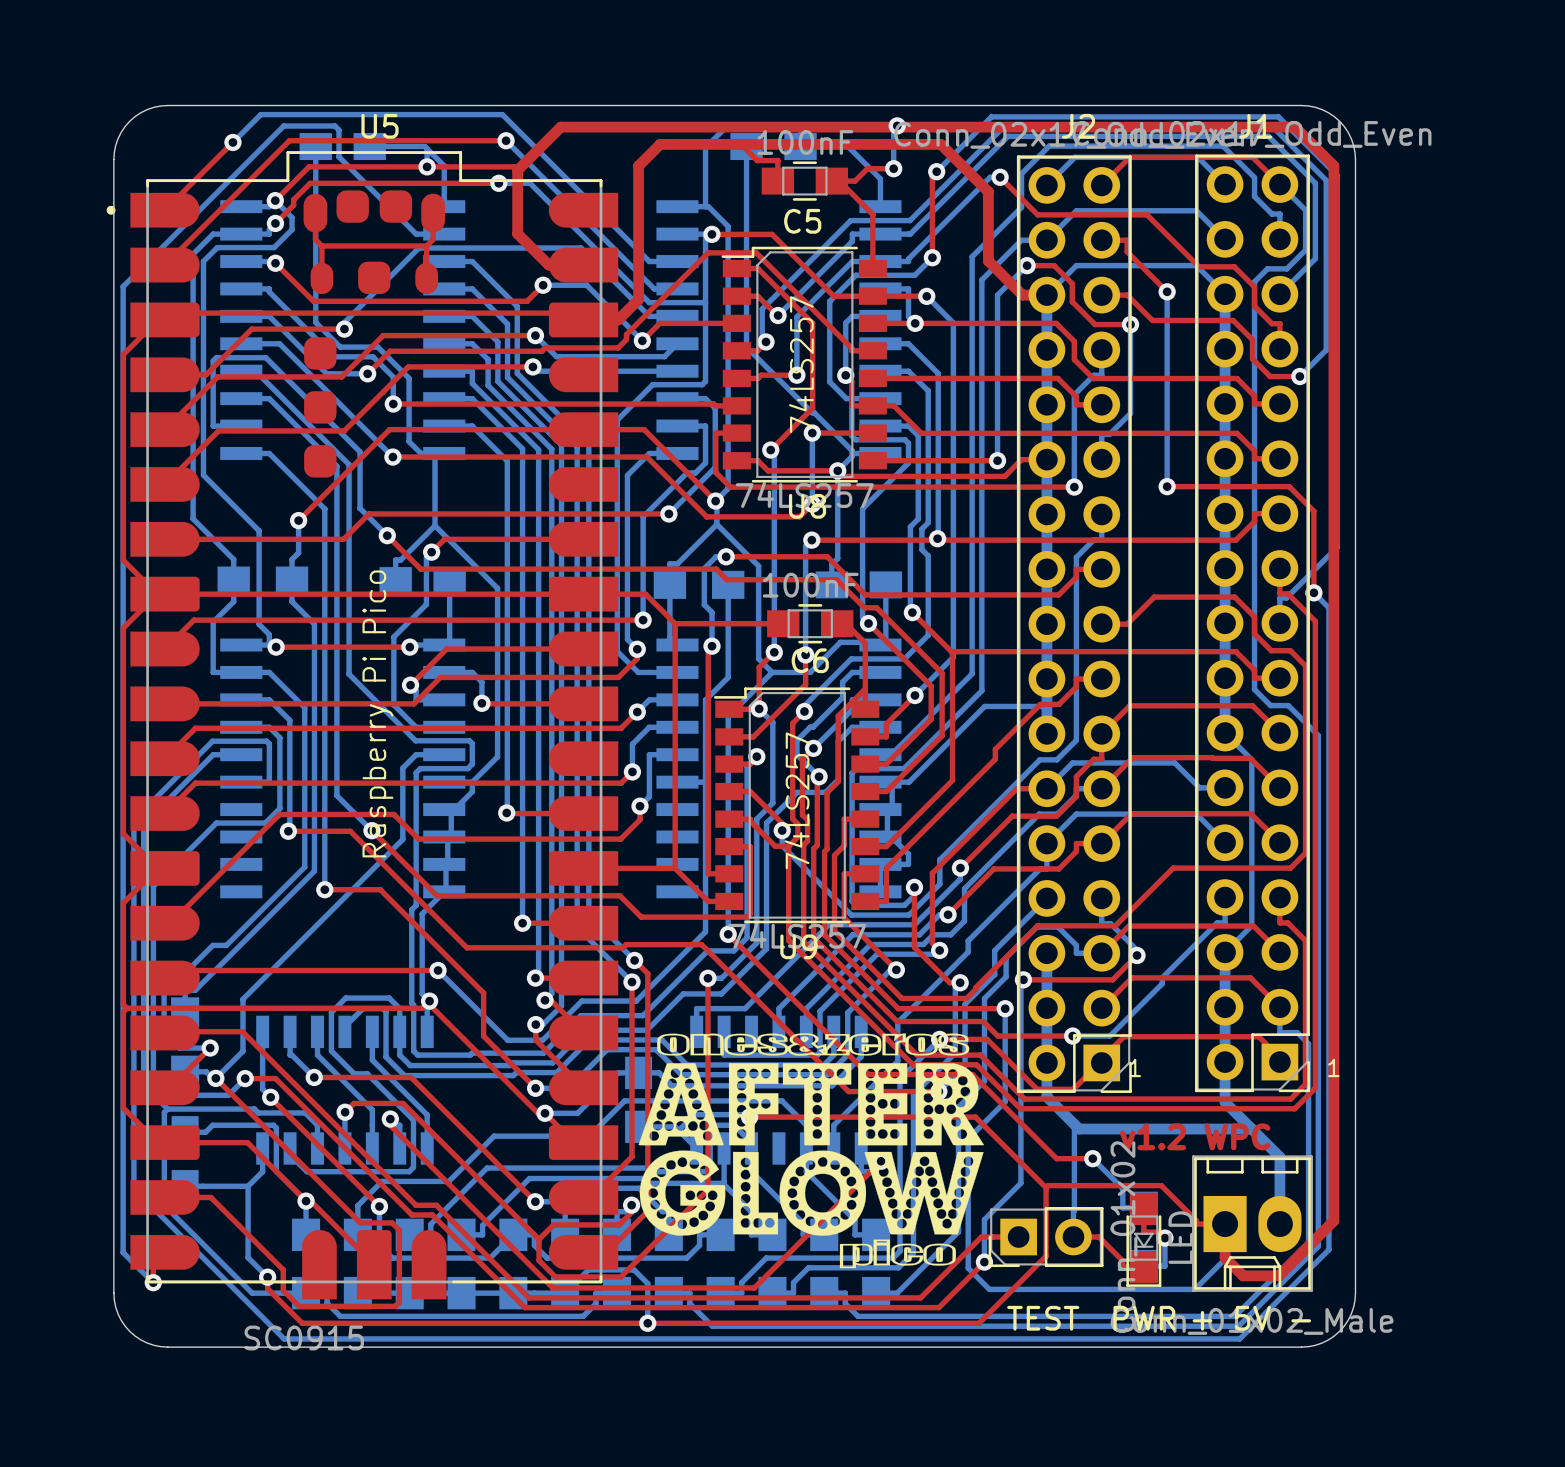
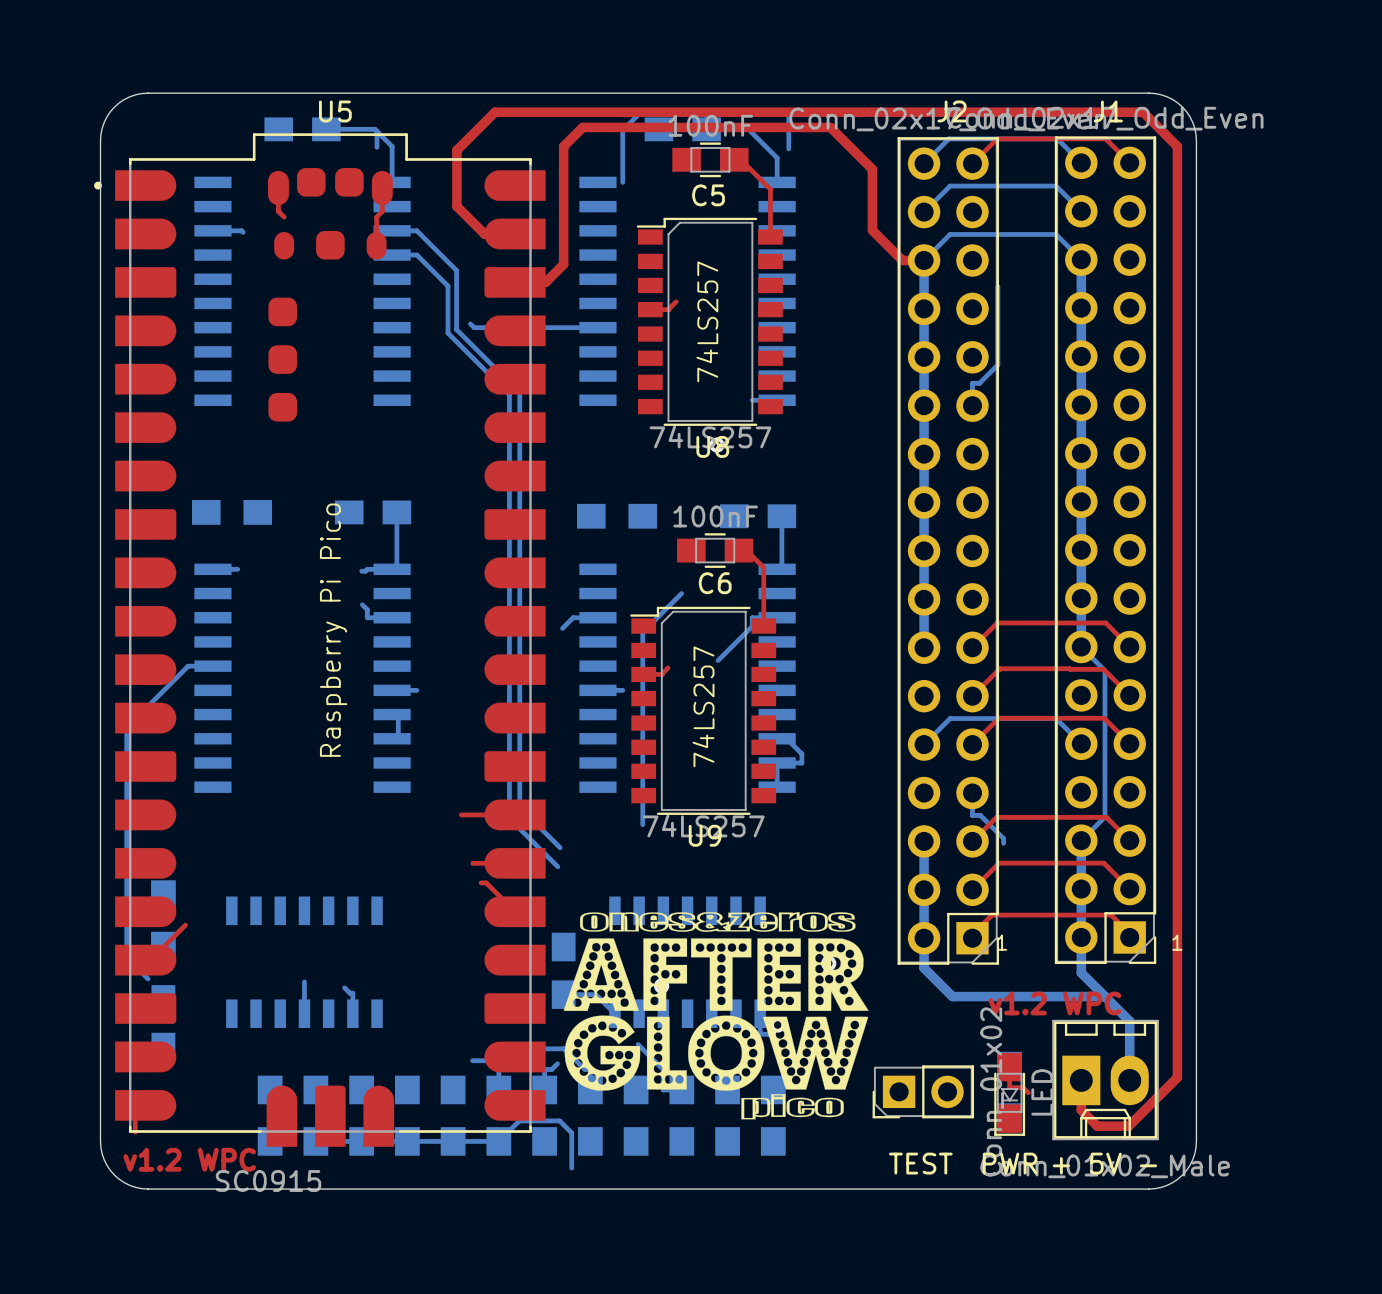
via: (897, 125) -> none
bottom track: (506, 140) (654, 288) (677, 288) -> none
top track: (506, 140) (289, 140) (165, 265) -> none
via: (506, 140) -> none
bottom track: (232, 142) (260, 114) (502, 114) (649, 261) (677, 261) -> none
top track: (232, 142) (165, 210) -> none
via: (232, 142) -> none
top track: (741, 144) (757, 160) (777, 160) (777, 181) -> none
bottom track: (315, 146) (315, 322) (340, 347) (377, 347) (409, 378) (409, 441) (420, 453) (444, 453) -> none
bottom track: (746, 146) (746, 347) (852, 450) (852, 456) (837, 470) (837, 558) (831, 564) (831, 584) -> none
via: (427, 166) -> none
top track: (893, 168) (867, 168) (855, 181) (839, 181) -> none
via: (893, 168) -> none
top track: (517, 170) (514, 166) (309, 166) (275, 200) -> none
bottom track: (936, 171) (991, 116) (1278, 116) (1337, 175) (1337, 547) (1286, 597) (1279, 597) (1279, 623) -> none
top track: (936, 171) (932, 176) (932, 257) -> none
via: (936, 171) -> none
bottom track: (1000, 177) (990, 177) (908, 259) (908, 261) (852, 261) (796, 316) (796, 375) -> none
top track: (1000, 177) (1037, 214) (1147, 214) (1198, 266) (1234, 266) (1254, 286) (1254, 306) (1271, 323) (1279, 323) (1279, 349) -> none
via: (1000, 177) -> none
bottom track: (498, 183) (530, 183) (649, 302) (705, 302) -> none
top track: (498, 183) (310, 183) (293, 199) (293, 205) (275, 223) -> none
via: (498, 183) -> none
bottom track: (1279, 184) (1305, 210) (1305, 250) (1286, 268) (1267, 268) (1254, 281) (1254, 689) (1270, 705) (1288, 705) (1318, 735) (1318, 1246) (1238, 1326) (712, 1326) (689, 1303) (689, 1293) (668, 1293) -> none
via: (275, 200) -> none
bottom track: (241, 206) (269, 206) (275, 201) (292, 217) (292, 229) (274, 247) (217, 247) (203, 261) (203, 475) (259, 530) (259, 624) (269, 634) (269, 645) (276, 647) -> none
bottom track: (677, 206) (708, 206) (728, 226) (728, 488) (715, 501) (716, 524) -> none
bottom track: (275, 223) (269, 229) (269, 234) (213, 234) (193, 254) (193, 518) (233, 559) (233, 601) (213, 622) (213, 672) (269, 672) (304, 707) (304, 867) (226, 945) (212, 945) (164, 994) (164, 1032) (179, 1048) (210, 1048) -> none
via: (275, 223) -> none
bottom track: (444, 234) (416, 234) (338, 156) (338, 130) (334, 126) (283, 126) (123, 286) (123, 1252) (153, 1282) -> none
bottom track: (677, 234) (705, 234) (705, 381) (702, 384) (652, 384) (617, 420) (617, 651) (638, 672) (677, 672) -> none
top track: (711, 234) (772, 234) (833, 296) (926, 296) -> none
via: (711, 234) -> none
bottom track: (1279, 239) (1279, 214) (1271, 214) (1254, 196) (1254, 177) (1223, 146) (1049, 146) (1021, 173) (1021, 207) (972, 256) (972, 673) (891, 754) (880, 754) -> none
bottom track: (1046, 240) (1021, 240) (981, 279) (981, 690) (904, 768) (856, 768) (852, 773) (852, 901) (856, 905) (904, 905) (914, 895) (914, 887) -> none
top track: (1101, 240) (1127, 240) (1127, 251) (1167, 291) -> none
top track: (426, 245) (321, 245) (321, 278) -> none
bottom track: (932, 257) (914, 275) (855, 275) (829, 301) (829, 381) (846, 398) (880, 398) -> none
via: (932, 257) -> none
top track: (275, 263) (313, 301) (527, 301) (543, 285) -> none
via: (275, 263) -> none
bottom track: (1027, 265) (997, 295) (997, 460) -> none
top track: (1027, 265) (1054, 265) (1072, 283) (1072, 301) (1095, 324) (1130, 324) -> none
via: (1027, 265) -> none
top track: (736, 268) (757, 268) (812, 323) (812, 408) (770, 450) -> none
bottom track: (543, 285) (586, 285) (642, 340) -> none
via: (543, 285) -> none
bottom track: (241, 288) (269, 288) (269, 291) (334, 356) (372, 356) (393, 377) (393, 404) -> none
bottom track: (880, 288) (908, 288) (908, 316) (915, 323) -> none
bottom track: (1167, 291) (1167, 486) -> none
via: (1167, 291) -> none
bottom track: (1279, 294) (1315, 258) (1315, 183) (1268, 136) (1007, 136) (910, 234) (852, 234) (852, 241) (778, 315) -> none
top track: (1101, 295) (1127, 295) (1152, 320) (1233, 320) (1252, 339) (1252, 358) (1270, 376) (1299, 376) -> none
top track: (736, 296) (757, 296) (778, 315) -> none
bottom track: (926, 296) (953, 322) (953, 657) (915, 695) -> none
via: (926, 296) -> none
via: (778, 315) -> none
bottom track: (241, 316) (269, 316) (326, 373) (367, 373) -> none
bottom track: (444, 316) (472, 316) (497, 341) (497, 381) (561, 445) (561, 1005) (542, 1024) (535, 1024) -> none
bottom track: (677, 316) (649, 316) (581, 248) (418, 248) (344, 322) (344, 329) -> none
bottom track: (880, 316) (852, 316) (845, 322) (845, 375) -> none
top track: (583, 319) (576, 313) (171, 313) (165, 319) (157, 319) (123, 354) (123, 560) (157, 594) -> none
top track: (736, 323) (659, 323) (642, 340) -> none
top track: (872, 323) (1056, 323) (1074, 341) (1074, 359) (1093, 378) (1237, 378) (1254, 396) (1254, 403) (1279, 403) -> none
via: (915, 323) -> none
via: (1130, 324) -> none
top track: (344, 329) (251, 329) (206, 374) (165, 374) -> none
via: (344, 329) -> none
bottom track: (535, 335) (556, 356) (664, 356) (677, 343) -> none
top track: (535, 335) (383, 335) (341, 376) (217, 376) (165, 429) -> none
via: (535, 335) -> none
via: (642, 340) -> none
bottom track: (766, 341) (762, 338) (762, 309) (850, 220) (909, 220) (1003, 126) (1272, 126) (1326, 180) (1326, 350) (1299, 376) -> none
via: (766, 341) -> none
bottom track: (241, 343) (279, 343) (392, 457) -> none
bottom track: (444, 343) (472, 343) (488, 359) (488, 385) (551, 449) (551, 993) (544, 1000) -> none
bottom track: (880, 343) (908, 343) (938, 373) (937, 538) -> none
bottom track: (1101, 349) (1101, 375) (1093, 375) (1074, 394) (1074, 487) -> none
top track: (872, 350) (851, 350) (851, 348) (756, 252) (708, 252) (626, 334) (626, 339) (618, 347) (545, 347) (541, 351) (390, 351) (367, 373) -> none
top track: (532, 366) (408, 366) (344, 430) (218, 430) (165, 484) -> none
via: (532, 366) -> none
bottom track: (241, 371) (255, 371) (349, 464) (349, 674) (415, 740) (469, 740) (472, 743) (472, 764) (467, 768) (420, 768) (416, 772) (416, 905) (411, 909) (411, 1003) (413, 1005) (413, 1050) (417, 1055) (543, 1053) (581, 1015) (642, 1015) (707, 950) (733, 950) (747, 937) (747, 766) (756, 756) -> none
bottom track: (444, 371) (472, 371) (472, 383) (538, 449) (538, 974) (535, 978) -> none
bottom track: (880, 371) (908, 371) (928, 390) (928, 522) (921, 529) (921, 549) (928, 555) (928, 635) (904, 658) (851, 658) (804, 705) (804, 711) -> none
via: (367, 373) -> none
top track: (796, 375) (761, 375) (757, 378) (736, 378) -> none
via: (796, 375) -> none
top track: (845, 375) (851, 381) (851, 405) (893, 405) (921, 433) (1237, 433) (1254, 450) (1254, 458) (1279, 458) -> none
via: (845, 375) -> none
via: (1299, 376) -> none
top track: (872, 378) (1057, 378) (1076, 396) (1076, 404) (1101, 404) -> none
bottom track: (241, 398) (269, 398) (336, 466) (336, 795) (371, 830) -> none
bottom track: (444, 398) (472, 398) (522, 448) (522, 923) -> none
bottom track: (677, 398) (705, 398) (715, 408) (715, 467) (668, 513) -> none
bottom track: (851, 398) (851, 435) (855, 439) (904, 439) (908, 443) (908, 462) (862, 508) (862, 617) (868, 623) -> none
top track: (393, 404) (713, 404) (715, 405) (736, 405) -> none
via: (393, 404) -> none
bottom track: (241, 426) (213, 426) (213, 360) (216, 357) (265, 357) (360, 451) (360, 508) (387, 535) -> none
bottom track: (444, 426) (472, 426) (507, 461) (506, 812) -> none
bottom track: (677, 426) (705, 426) (705, 462) (695, 472) (687, 472) (643, 516) (643, 620) -> none
bottom track: (880, 426) (908, 426) (918, 435) (918, 519) (910, 526) (910, 610) (912, 612) -> none
top track: (736, 433) (715, 433) (715, 472) (730, 487) (1074, 487) -> none
bottom track: (812, 433) (812, 504) -> none
via: (812, 433) -> none
bottom track: (770, 450) (774, 453) (774, 652) -> none
via: (770, 450) -> none
bottom track: (241, 453) (269, 453) (324, 508) (324, 889) -> none
bottom track: (435, 453) (435, 525) -> none
bottom track: (677, 453) (649, 453) (627, 475) (627, 639) (637, 649) -> none
top track: (392, 457) (646, 457) (706, 516) (799, 516) (812, 504) -> none
via: (392, 457) -> none
top track: (1046, 459) (1021, 459) (1004, 476) (843, 476) (837, 470) (768, 470) (757, 460) (736, 460) -> none
top track: (872, 460) (997, 460) -> none
via: (997, 460) -> none
via: (837, 470) -> none
top track: (1167, 486) (1289, 486) (1313, 511) (1313, 592) -> none
via: (1167, 486) -> none
via: (1074, 487) -> none
top track: (715, 501) (644, 429) (389, 429) (298, 520) -> none
via: (715, 501) -> none
top track: (668, 513) (369, 513) (343, 539) (165, 539) -> none
via: (668, 513) -> none
top track: (1279, 513) (1254, 513) (1254, 521) (1235, 540) (811, 540) -> none
bottom track: (1101, 514) (1101, 539) (1093, 539) (1076, 557) (1076, 740) (1056, 759) (1039, 759) (939, 859) (939, 884) (908, 915) (851, 915) (782, 845) (782, 830) -> none
bottom track: (298, 520) (298, 552) (292, 559) (292, 601) (314, 624) (314, 871) (195, 990) (185, 990) (185, 1013) -> none
via: (298, 520) -> none
bottom track: (716, 524) (758, 566) (758, 658) (772, 672) (810, 672) (840, 642) (883, 642) -> none
bottom track: (716, 524) (677, 563) (669, 563) (669, 637) (677, 645) -> none
bottom track: (435, 525) (497, 588) (497, 756) (472, 782) (472, 791) (454, 809) (444, 809) -> none
bottom track: (435, 525) (400, 560) (395, 560) (395, 580) -> none
top track: (387, 535) (420, 569) (716, 569) (726, 579) (836, 579) (864, 607) (876, 607) (942, 673) (942, 735) (886, 791) (865, 791) -> none
via: (387, 535) -> none
via: (937, 538) -> none
top track: (583, 539) (444, 539) (431, 552) -> none
bottom track: (811, 540) (805, 546) (805, 654) -> none
via: (811, 540) -> none
bottom track: (431, 552) (426, 557) (426, 604) (393, 637) (393, 704) (416, 727) (444, 727) -> none
via: (431, 552) -> none
bottom track: (726, 556) (716, 556) (704, 568) (704, 604) (712, 612) (712, 646) -> none
top track: (726, 556) (827, 556) (865, 594) (1058, 594) (1076, 577) (1076, 569) (1101, 569) -> none
via: (726, 556) -> none
top track: (1279, 568) (1279, 593) (1287, 593) (1315, 621) (1315, 1088) (1294, 1108) (1020, 1108) (976, 1064) (912, 1064) (788, 940) (788, 846) -> none
bottom track: (728, 584) (728, 677) (705, 700) (705, 931) (636, 1001) (581, 1001) (542, 1040) (507, 1040) (438, 970) -> none
bottom track: (1313, 592) (1328, 607) (1328, 1249) (1239, 1338) (284, 1338) (133, 1188) (133, 819) (212, 741) (266, 741) (269, 743) (269, 782) (241, 782) -> none
via: (1313, 592) -> none
top track: (157, 594) (123, 628) (123, 833) (157, 868) -> none
top track: (157, 594) (645, 594) (675, 623) -> none
top track: (912, 612) (951, 651) (1235, 651) (1254, 670) (1254, 678) (1279, 678) -> none
via: (912, 612) -> none
top track: (643, 620) (193, 620) (165, 649) -> none
via: (643, 620) -> none
top track: (675, 623) (675, 868) -> none
top track: (675, 623) (783, 623) -> none
top track: (868, 623) (931, 686) (931, 719) (886, 764) (865, 764) -> none
via: (868, 623) -> none
top track: (1101, 624) (1127, 624) (1154, 597) (1234, 597) (1254, 616) (1254, 633) (1271, 650) (1290, 650) (1305, 665) (1305, 853) (1290, 868) (1173, 868) (1115, 925) (1037, 925) (966, 998) (901, 998) (834, 931) (834, 855) (844, 845) (844, 819) (865, 819) -> none
top track: (712, 646) (708, 649) (708, 873) (729, 873) -> none
via: (712, 646) -> none
top track: (276, 647) (409, 647) -> none
via: (276, 647) -> none
via: (409, 647) -> none
top track: (583, 649) (446, 649) (410, 685) -> none
top track: (637, 649) (637, 658) (618, 677) (440, 677) (414, 703) (165, 703) -> none
via: (637, 649) -> none
top track: (952, 651) (952, 780) (886, 846) (865, 846) -> none
top track: (774, 652) (759, 667) (759, 708) (729, 709) -> none
via: (774, 652) -> none
top track: (805, 654) (805, 684) (753, 736) (729, 736) -> none
via: (805, 654) -> none
bottom track: (444, 672) (472, 672) (481, 682) (481, 703) -> none
bottom track: (880, 672) (852, 672) (842, 682) (842, 697) (796, 740) (796, 754) (819, 776) -> none
top track: (1101, 679) (1076, 679) (1076, 686) (1058, 704) (1040, 704) (995, 749) (995, 759) (886, 868) (886, 901) (865, 901) -> none
via: (410, 685) -> none
top track: (865, 688) (838, 715) (838, 781) (827, 792) (824, 934) (898, 1008) (1005, 1008) -> none
top track: (915, 695) (886, 724) (886, 736) (865, 736) -> none
via: (915, 695) -> none
bottom track: (241, 699) (269, 699) (289, 720) (288, 831) -> none
top track: (481, 703) (583, 703) -> none
via: (481, 703) -> none
bottom track: (1046, 706) (984, 706) (909, 782) (880, 782) -> none
bottom track: (759, 708) (772, 722) (772, 803) (756, 819) (756, 943) (721, 978) (707, 978) -> none
via: (759, 708) -> none
top track: (804, 711) (792, 723) (792, 818) (797, 824) (797, 837) (788, 846) -> none
via: (804, 711) -> none
top track: (637, 712) (621, 728) (195, 728) (165, 758) -> none
via: (637, 712) -> none
bottom track: (241, 727) (269, 727) (279, 737) (279, 808) (265, 823) (216, 823) (153, 886) (153, 1080) (167, 1095) (228, 1095) (245, 1078) -> none
bottom track: (677, 727) (649, 727) (632, 744) (632, 771) -> none
bottom track: (880, 727) (852, 727) (838, 741) (838, 779) (825, 792) (797, 792) (766, 823) (766, 948) (721, 993) (683, 993) (646, 1030) (585, 1030) (552, 1062) (512, 1062) (509, 1065) (410, 1065) (399, 1055) (399, 1008) (389, 998) (345, 998) (331, 1012) (331, 1050) (354, 1073) (367, 1073) (413, 1120) (413, 1167) (409, 1171) (306, 1171) (290, 1154) (290, 1148) -> none
top track: (1101, 733) (1101, 759) (1093, 759) (1076, 776) (1076, 796) (1056, 816) (1012, 816) (960, 868) -> none
top track: (813, 748) (802, 759) (802, 814) (807, 820) (807, 841) (803, 844) (803, 941) (916, 1055) (980, 1055) (1024, 1099) (1290, 1099) (1305, 1084) (1305, 940) (1287, 922) (1279, 922) (1279, 897) -> none
via: (813, 748) -> none
bottom track: (444, 754) (416, 754) (402, 768) (402, 839) (242, 999) (242, 1051) (215, 1078) (212, 1078) (206, 1071) (185, 1071) -> none
bottom track: (677, 754) (649, 754) (649, 796) (640, 806) -> none
via: (756, 756) -> none
top track: (632, 771) (621, 783) (195, 783) (165, 813) -> none
via: (632, 771) -> none
top track: (819, 776) (817, 778) (817, 845) (813, 848) (813, 938) (897, 1021) (983, 1021) (997, 1036) (1072, 1036) -> none
via: (819, 776) -> none
bottom track: (892, 782) (892, 809) -> none
bottom track: (1225, 787) (1199, 787) (1174, 762) (1072, 762) (1046, 788) -> none
top track: (1046, 788) (1016, 788) (932, 873) (932, 943) (939, 950) -> none
bottom track: (1101, 788) (1076, 788) (1076, 795) (1057, 814) (1039, 814) (964, 888) (964, 921) (950, 934) (933, 934) (923, 944) (870, 944) (806, 1008) (806, 1031) -> none
top track: (729, 791) (750, 791) (782, 823) (782, 830) -> none
top track: (640, 806) (640, 819) (620, 839) (418, 839) (393, 814) (279, 814) (170, 923) (165, 923) -> none
via: (640, 806) -> none
bottom track: (892, 809) (887, 814) (887, 836) -> none
top track: (506, 812) (583, 813) -> none
via: (506, 812) -> none
top track: (729, 819) (750, 819) (750, 821) (775, 846) (788, 846) -> none
top track: (371, 830) (437, 895) (619, 895) (641, 917) (746, 917) (750, 913) (750, 846) (729, 846) -> none
via: (371, 830) -> none
via: (782, 830) -> none
top track: (288, 831) (350, 831) (466, 947) (623, 947) (626, 944) (701, 944) (848, 1091) (938, 1091) -> none
via: (288, 831) -> none
bottom track: (447, 836) (447, 864) (444, 864) -> none
bottom track: (1046, 843) (1046, 868) (1040, 868) (968, 940) (968, 952) (897, 1022) (897, 1061) (833, 1125) (833, 1148) -> none
top track: (1101, 843) (1076, 843) (1076, 851) (1058, 868) (993, 868) (948, 914) -> none
bottom track: (446, 864) (446, 891) (422, 913) (422, 993) (429, 1001) (427, 1003) (427, 1031) -> none
top track: (157, 868) (123, 903) (123, 1004) (127, 1008) -> none
top track: (583, 868) (675, 868) -> none
top track: (675, 868) (708, 901) (729, 901) -> none
bottom track: (960, 868) (960, 878) (914, 924) (828, 924) (745, 1008) (696, 1008) (696, 1031) -> none
via: (960, 868) -> none
top track: (865, 873) (844, 873) (844, 917) (896, 969) -> none
top track: (914, 887) (914, 947) (949, 982) (960, 982) -> none
via: (914, 887) -> none
top track: (324, 889) (380, 889) (483, 993) (483, 1036) (535, 1088) -> none
via: (324, 889) -> none
bottom track: (1225, 897) (1225, 922) (1217, 922) (1162, 977) (1162, 983) (1109, 1036) (1072, 1036) -> none
bottom track: (1046, 898) (994, 950) (994, 974) (965, 1004) (965, 1065) (938, 1091) -> none
bottom track: (948, 914) (939, 914) (919, 934) (852, 934) (778, 1008) (778, 1031) -> none
via: (948, 914) -> none
via: (522, 923) -> none
top track: (728, 934) (868, 1074) (972, 1074) (1056, 1158) (1092, 1158) -> none
via: (728, 934) -> none
bottom track: (939, 950) (935, 954) (877, 954) (820, 1011) (820, 1052) (817, 1055) (724, 1055) (724, 1031) -> none
via: (939, 950) -> none
bottom track: (1101, 953) (1076, 953) (1076, 945) (1058, 927) (1036, 927) (1006, 957) (1006, 976) (984, 998) (984, 1081) (958, 1107) (958, 1231) (897, 1293) (876, 1293) -> none
top track: (1137, 955) (1112, 979) (1023, 979) -> none
via: (1137, 955) -> none
top track: (634, 960) (647, 973) (647, 1211) (606, 1252) (583, 1252) -> none
via: (634, 960) -> none
bottom track: (896, 969) (890, 969) (847, 1012) (847, 1054) (827, 1074) (681, 1074) (656, 1049) (607, 1049) (568, 1088) (535, 1088) -> none
via: (896, 969) -> none
top track: (438, 970) (172, 970) (165, 978) -> none
via: (438, 970) -> none
via: (535, 978) -> none
top track: (707, 978) (707, 1189) (620, 1276) (555, 1276) (539, 1260) (539, 1239) -> none
via: (707, 978) -> none
bottom track: (1023, 979) (1020, 982) (1020, 1183) (984, 1219) (984, 1262) -> none
via: (1023, 979) -> none
top track: (632, 982) (632, 1156) (591, 1197) (583, 1197) -> none
via: (632, 982) -> none
bottom track: (960, 982) (955, 987) (955, 1052) (913, 1094) (913, 1252) (898, 1267) (808, 1267) (793, 1282) (793, 1293) (772, 1293) -> none
via: (960, 982) -> none
via: (544, 1000) -> none
top track: (429, 1001) (422, 1008) (127, 1008) -> none
via: (429, 1001) -> none
top track: (427, 1002) (538, 1113) (545, 1113) (574, 1142) (583, 1142) -> none
bottom track: (1279, 1007) (1279, 1032) (1297, 1032) (1308, 1043) (1308, 1242) (1234, 1316) (858, 1316) (845, 1303) (845, 1293) (824, 1293) -> none
top track: (127, 1008) (123, 1011) (123, 1108) (157, 1142) (247, 1142) (306, 1201) (310, 1201) (374, 1264) -> none
bottom track: (1005, 1008) (1005, 1101) (968, 1138) (968, 1268) (989, 1289) (1194, 1289) (1225, 1259) (1225, 1224) -> none
via: (1005, 1008) -> none
top track: (535, 1024) (535, 1040) (583, 1087) -> none
via: (535, 1024) -> none
bottom track: (262, 1031) (262, 1089) (270, 1097) -> none
bottom track: (290, 1031) (290, 1055) (314, 1077) -> none
bottom track: (317, 1031) (317, 1055) (372, 1109) (372, 1148) -> none
bottom track: (344, 1031) (344, 1026) (362, 1008) (383, 1008) (386, 1011) (386, 1057) (404, 1075) (513, 1075) (516, 1072) (556, 1072) (589, 1039) (661, 1039) (686, 1064) (823, 1064) (833, 1055) (833, 1031) -> none
bottom track: (372, 1031) (372, 1060) (427, 1114) (427, 1148) -> none
bottom track: (861, 1031) (861, 1056) (832, 1085) (672, 1085) (659, 1072) (618, 1072) (577, 1113) (545, 1113) -> none
top track: (165, 1032) (242, 1031) (416, 1205) (436, 1205) (529, 1297) (920, 1297) (981, 1237) (1018, 1237) -> none
via: (1072, 1036) -> none
bottom track: (939, 1039) (900, 1079) (900, 1251) (893, 1258) (766, 1258) (741, 1282) (741, 1293) (720, 1293) -> none
top track: (939, 1039) (987, 1039) (1037, 1089) (1073, 1089) (1101, 1060) -> none
via: (939, 1039) -> none
via: (210, 1048) -> none
top track: (314, 1077) (411, 1077) (535, 1201) -> none
via: (314, 1077) -> none
top track: (215, 1078) (360, 1222) (392, 1222) (399, 1230) (399, 1302) (395, 1306) (299, 1306) (283, 1290) (283, 1269) (210, 1197) (165, 1197) -> none
via: (215, 1078) -> none
top track: (245, 1078) (275, 1078) (412, 1215) (432, 1215) (525, 1307) (938, 1307) (984, 1262) -> none
via: (245, 1078) -> none
via: (535, 1088) -> none
top track: (270, 1097) (379, 1206) -> none
via: (270, 1097) -> none
top track: (345, 1112) (353, 1103) (403, 1103) (539, 1239) -> none
via: (345, 1112) -> none
via: (545, 1113) -> none
bottom track: (749, 1117) (747, 1114) (694, 1114) (678, 1130) -> none
top track: (749, 1117) (975, 1117) (1046, 1187) -> none
top track: (390, 1119) (390, 1125) (552, 1287) (754, 1287) (881, 1161) -> none
via: (390, 1119) -> none
bottom track: (1074, 1124) (1073, 1237) -> none
bottom track: (185, 1132) (205, 1132) (212, 1125) (273, 1125) (276, 1128) (276, 1171) (306, 1201) (306, 1234) (327, 1234) (327, 1303) (340, 1316) (583, 1316) (595, 1303) (595, 1293) (617, 1293) -> none
bottom track: (262, 1148) (262, 1171) (248, 1186) -> none
bottom track: (317, 1148) (317, 1125) (305, 1112) (258, 1112) (254, 1109) (167, 1109) (164, 1112) (164, 1205) (252, 1293) (306, 1293) -> none
bottom track: (724, 1148) (722, 1183) (648, 1183) (643, 1178) (529, 1178) (482, 1225) (482, 1234) (461, 1234) -> none
bottom track: (1092, 1158) (1122, 1188) (1122, 1207) (1143, 1207) -> none
via: (1092, 1158) -> none
bottom track: (185, 1186) (248, 1186) -> none
bottom track: (248, 1186) (248, 1257) (267, 1277) -> none
top track: (1046, 1187) (1046, 1256) (978, 1323) (302, 1323) (267, 1288) (267, 1277) -> none
top track: (1046, 1187) (1048, 1185) (1161, 1185) (1196, 1220) (1196, 1224) (1225, 1224) -> none
via: (306, 1201) -> none
via: (535, 1201) -> none
top track: (631, 1205) (631, 1212) (619, 1224) (553, 1224) (539, 1239) -> none
via: (631, 1205) -> none
bottom track: (379, 1206) (379, 1245) (392, 1258) (490, 1258) (513, 1234) (534, 1234) (534, 1245) (547, 1258) (686, 1258) (699, 1245) (699, 1234) (720, 1234) -> none
via: (379, 1206) -> none
bottom track: (357, 1234) (357, 1205) (382, 1181) (448, 1181) (494, 1136) (589, 1136) (624, 1100) (782, 1100) (806, 1125) (806, 1171) (855, 1220) (855, 1234) (876, 1234) -> none
bottom track: (409, 1234) (430, 1234) (430, 1224) (487, 1168) (655, 1168) (659, 1171) (706, 1171) (710, 1167) (710, 1129) (714, 1125) (734, 1125) (751, 1142) (751, 1171) (803, 1223) (803, 1234) (824, 1234) -> none
top track: (1073, 1237) (1098, 1237) (1122, 1260) (1122, 1267) (1143, 1267) -> none
bottom track: (1164, 1238) (1164, 1266) (1143, 1266) -> none
via: (1164, 1238) -> none
via: (984, 1262) -> none
via: (267, 1277) -> none
via: (153, 1282) -> none
text: none -> v1.2 WPC (189, 1159)
via: (647, 1323) -> none

